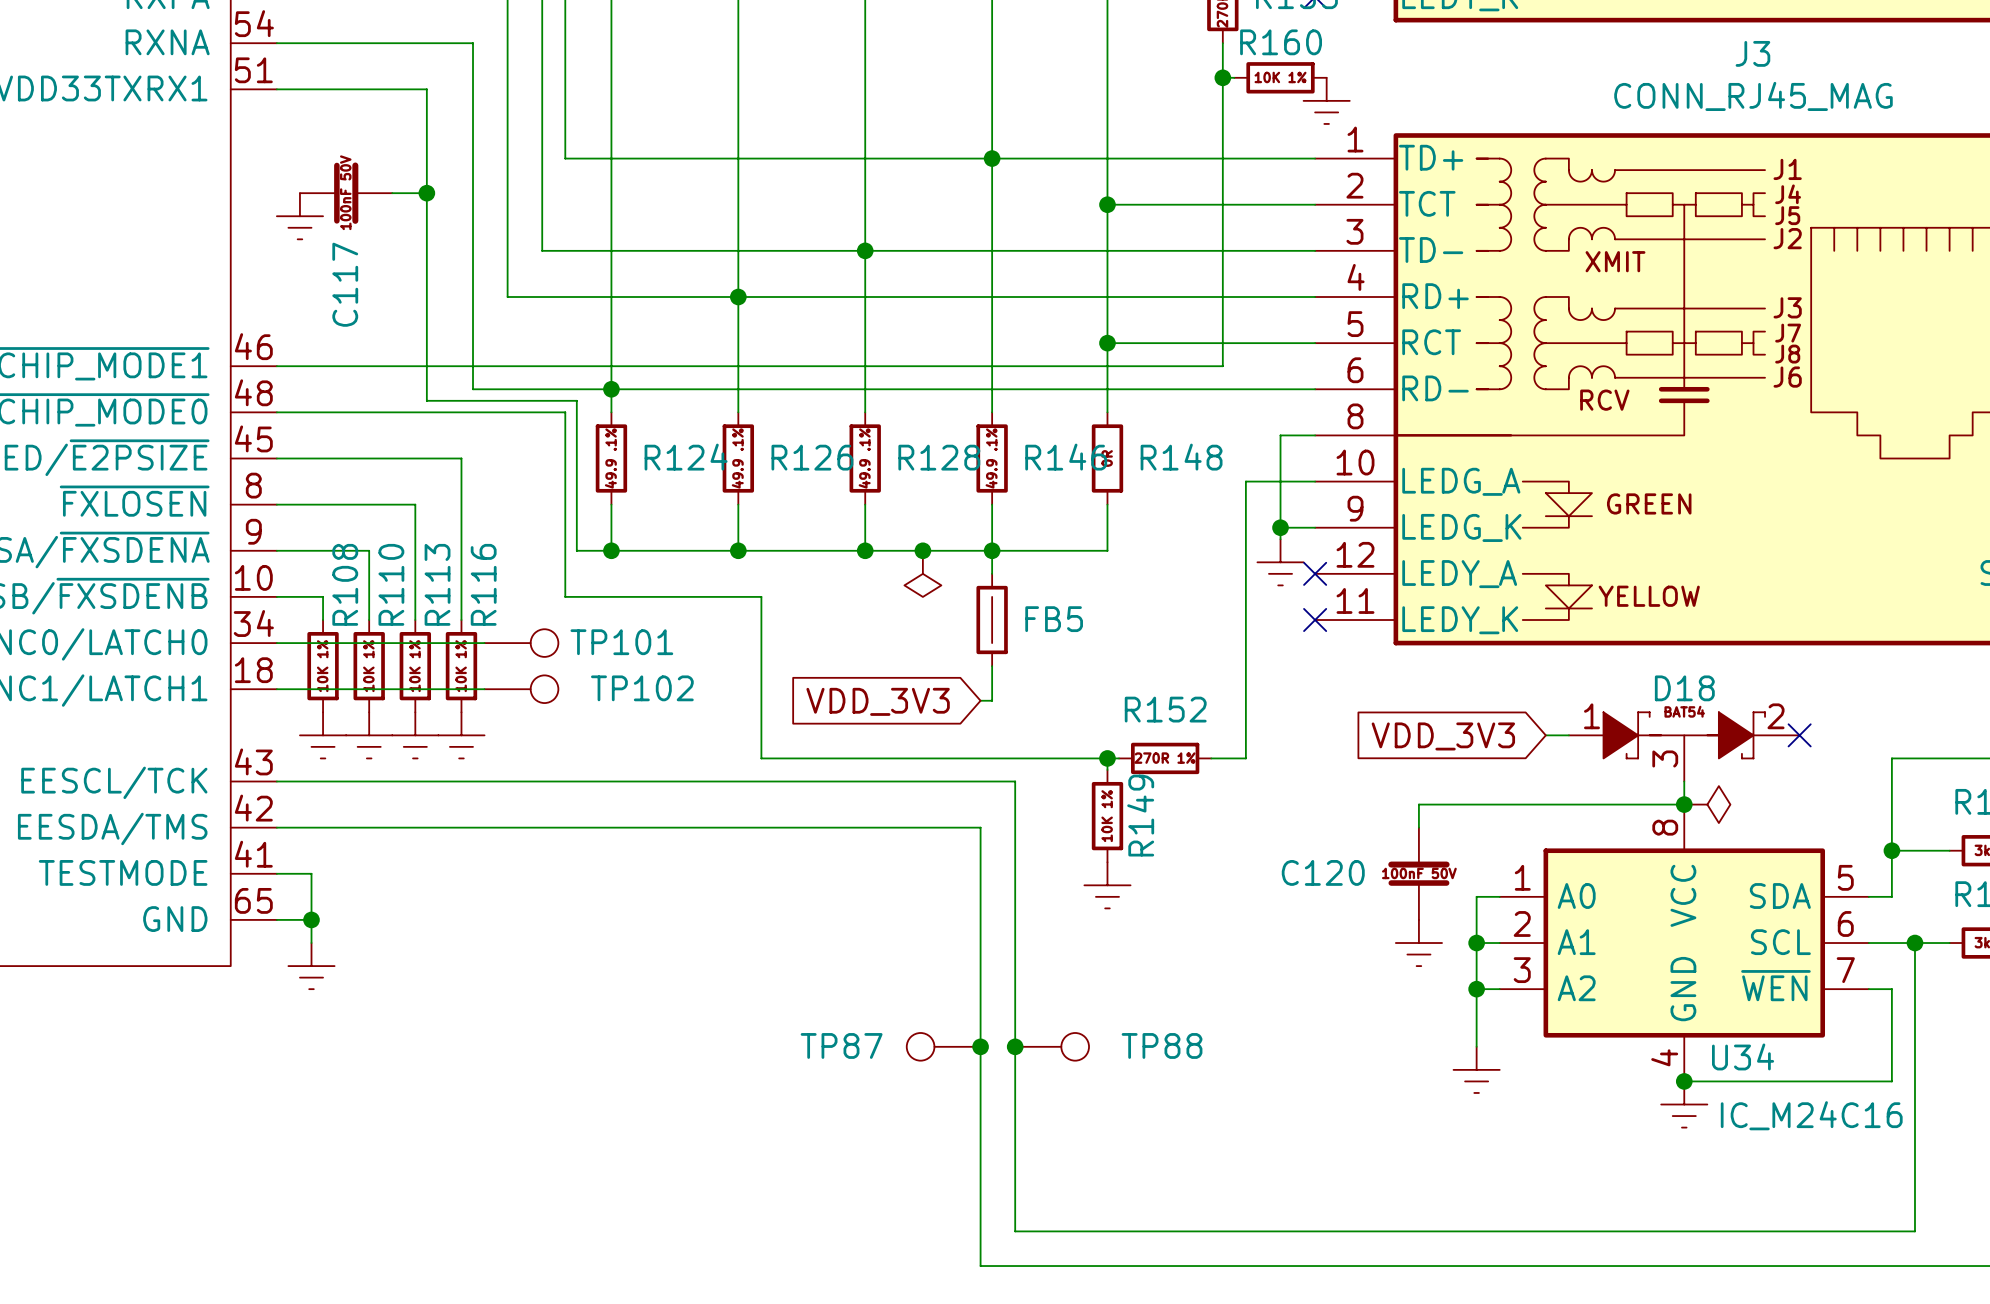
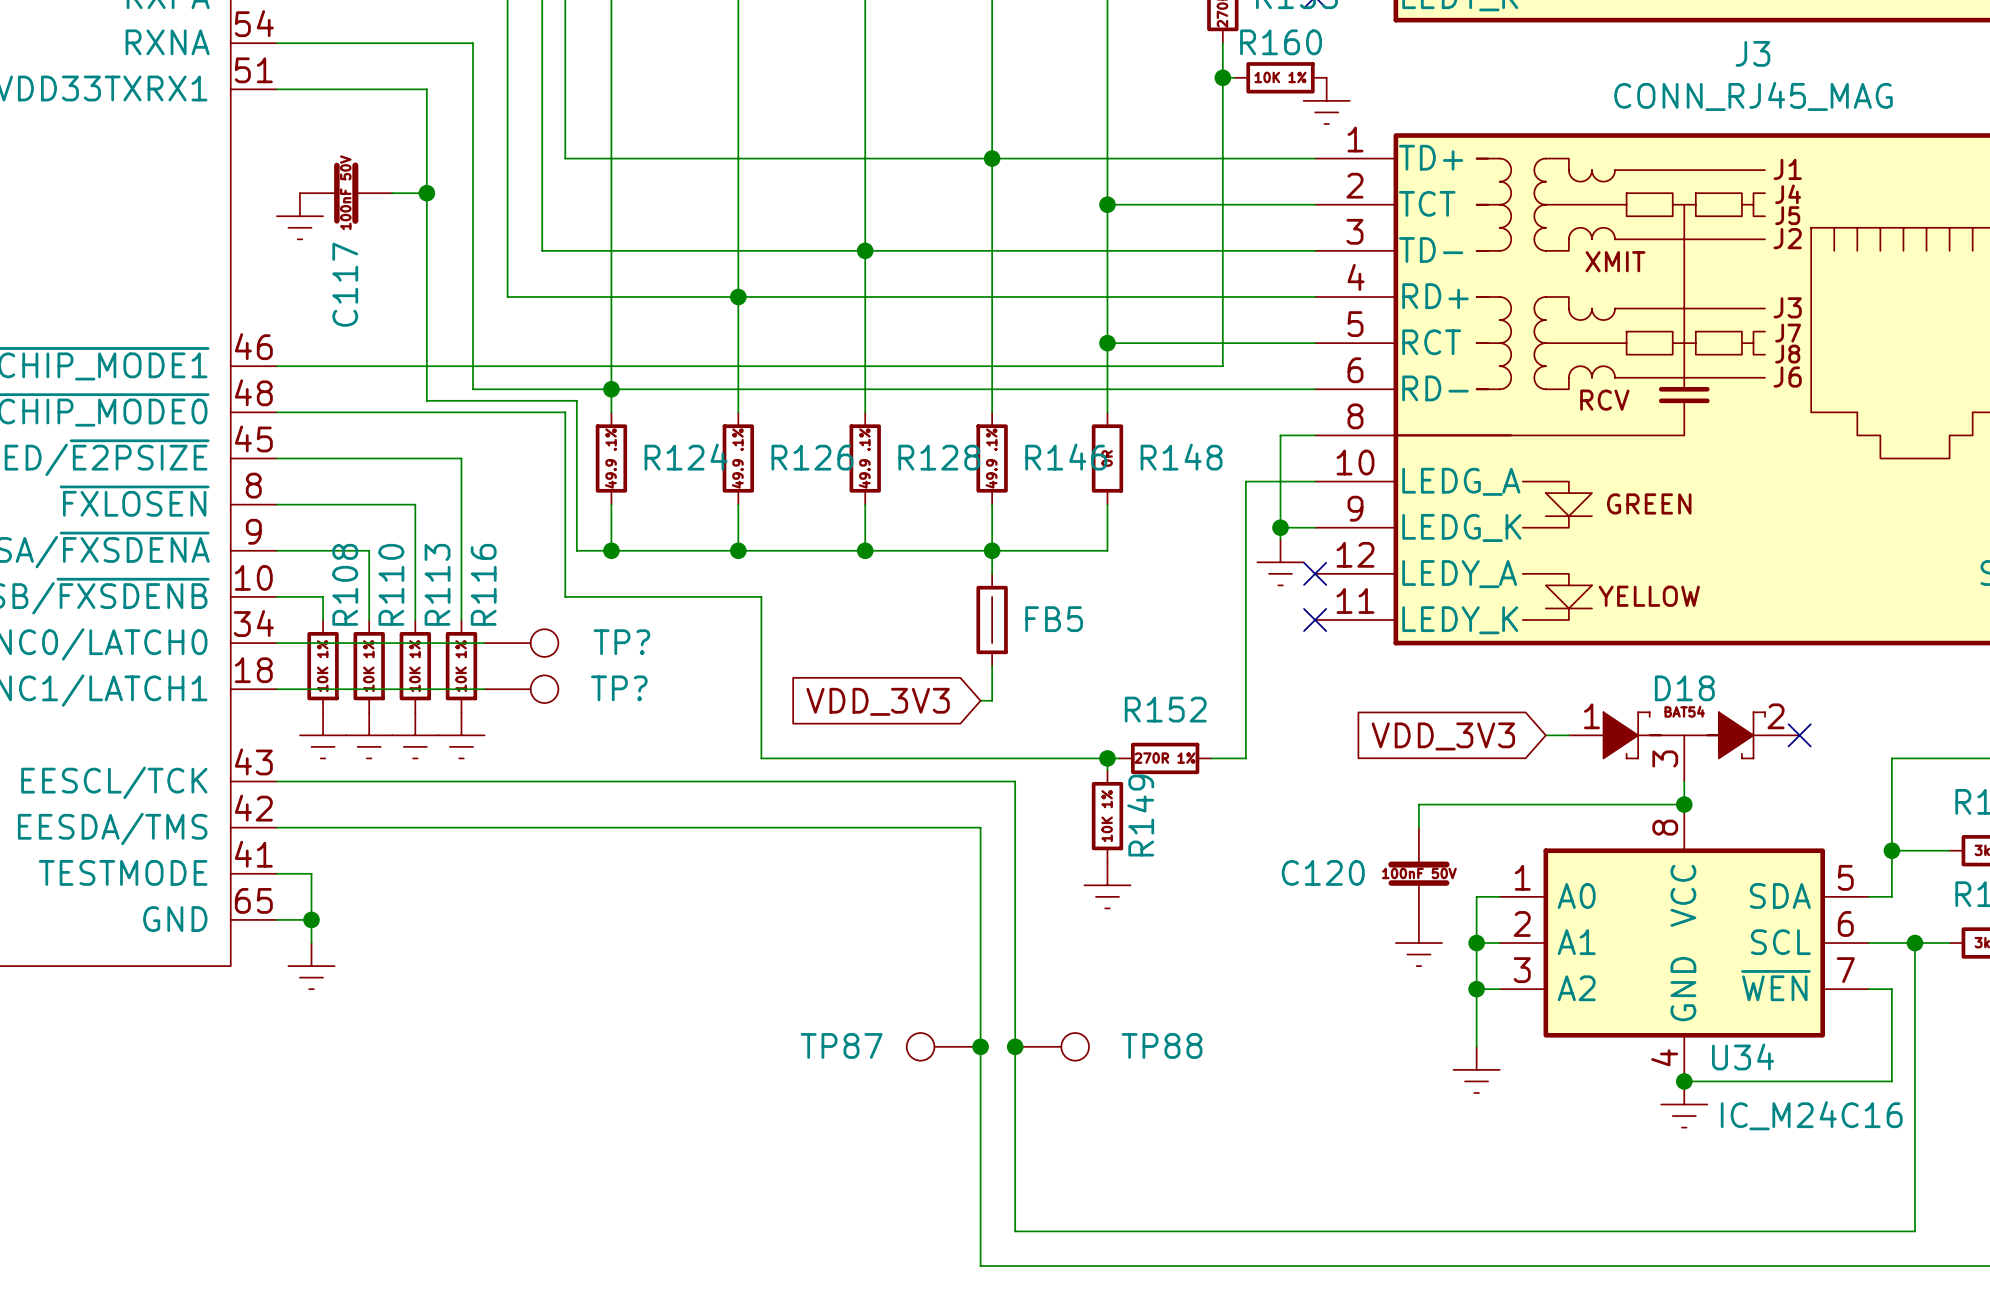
junction: (922, 550) -> none
power symbol: (922, 573) -> none
TP101 name: TP101 (621, 642) -> TP? (621, 642)
TP102 name: TP102 (642, 688) -> TP? (619, 688)
power symbol: (1707, 804) -> none

